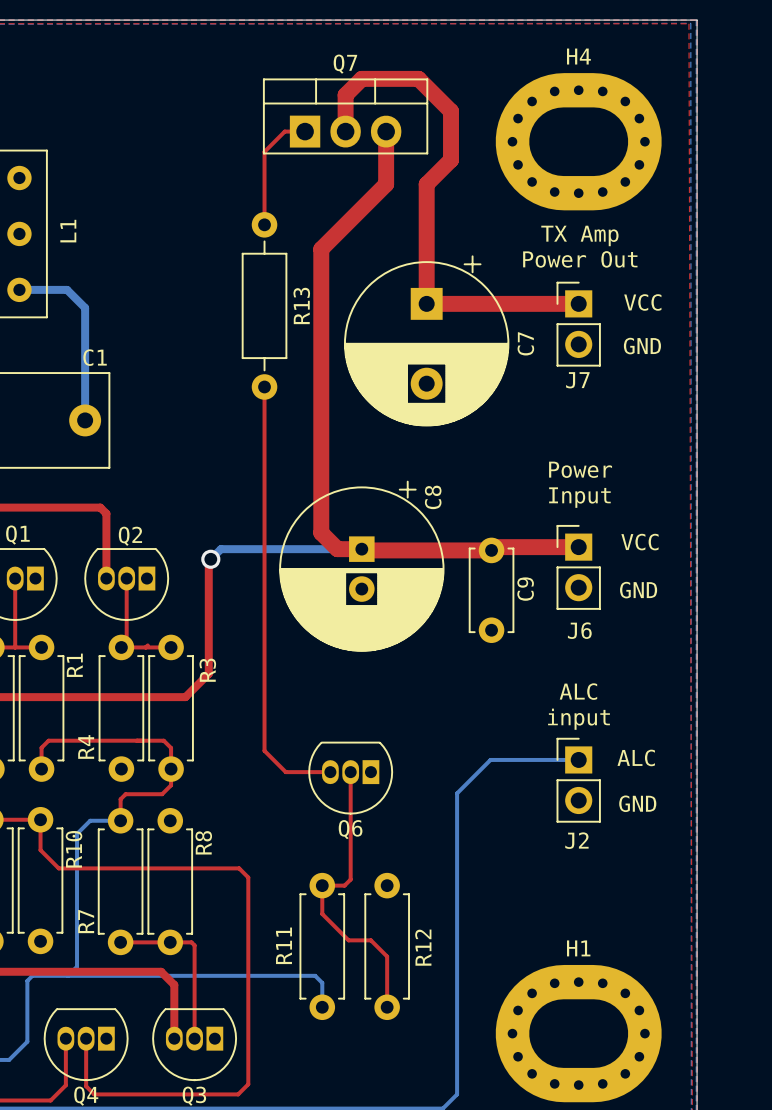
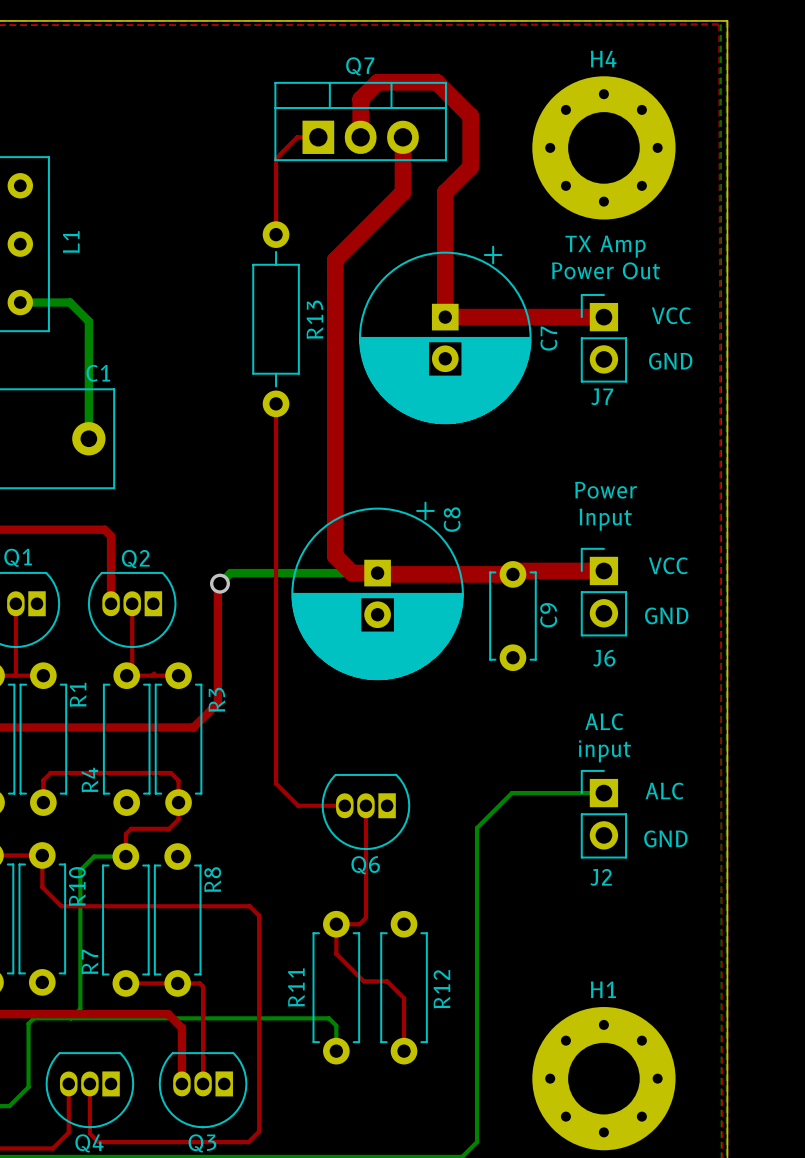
H4 footprint: [495, 73, 662, 211] -> [532, 76, 676, 220]
C7 footprint: [344, 255, 510, 427] -> [359, 245, 532, 425]
H1 footprint: [495, 964, 662, 1103] -> [532, 1007, 676, 1151]

